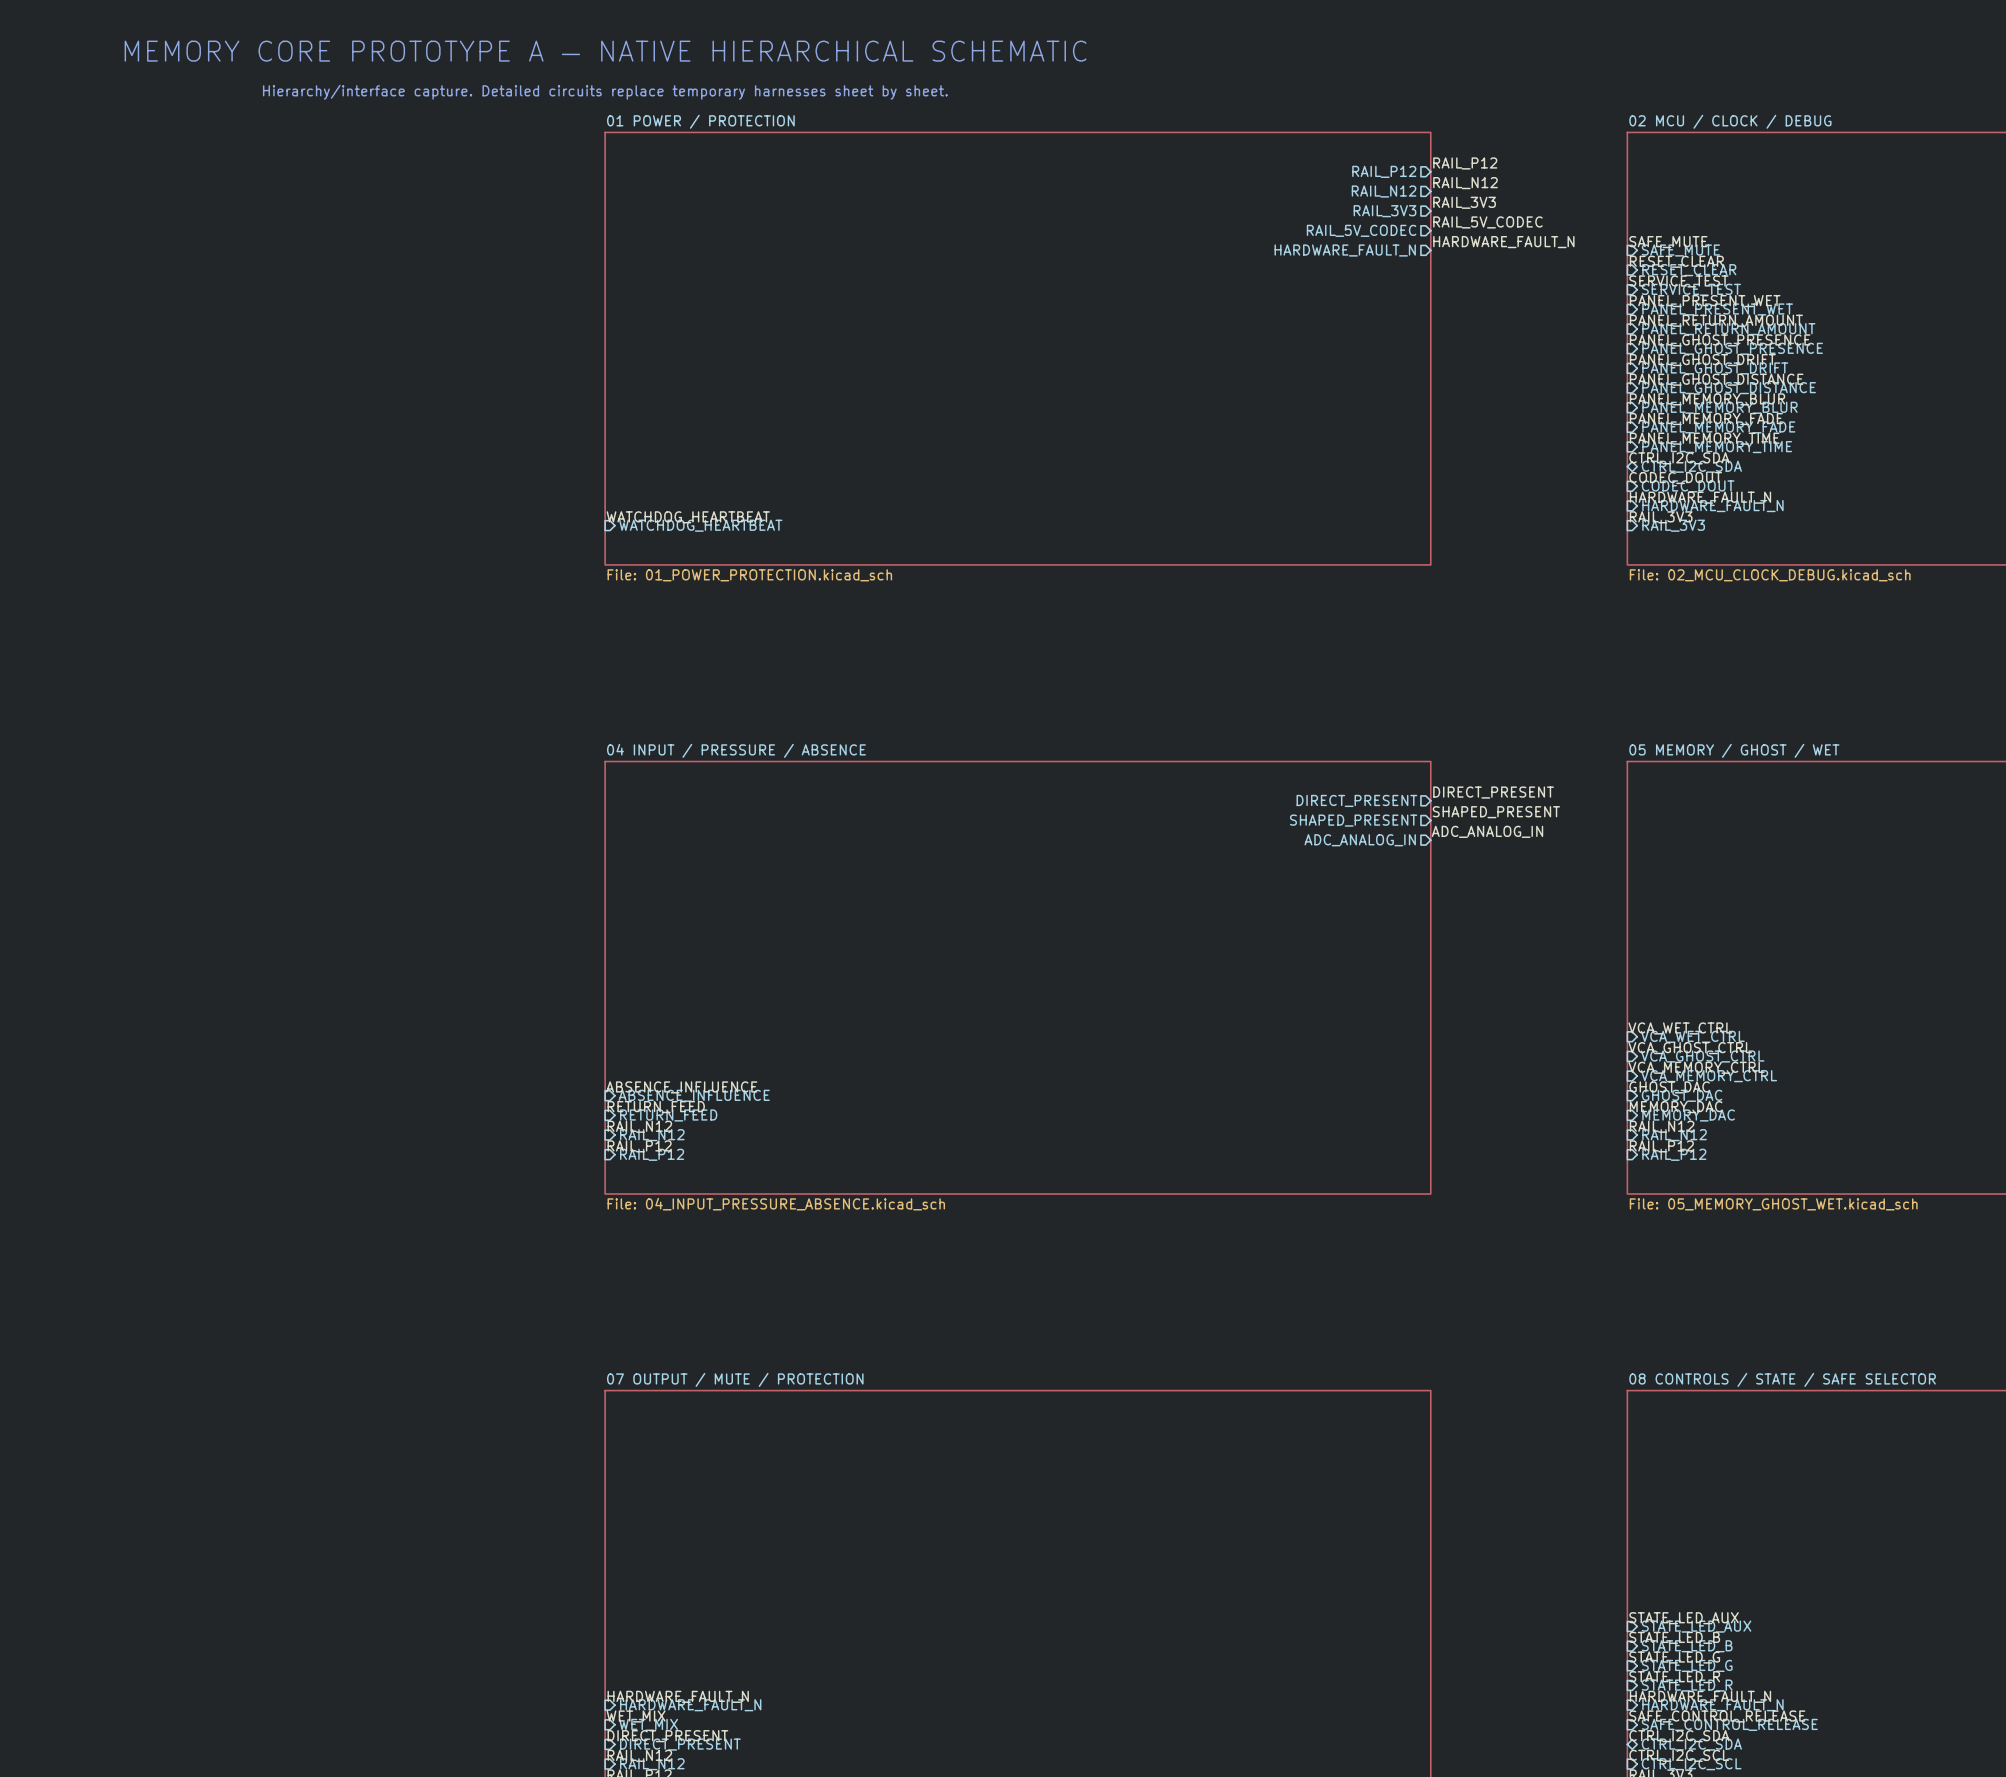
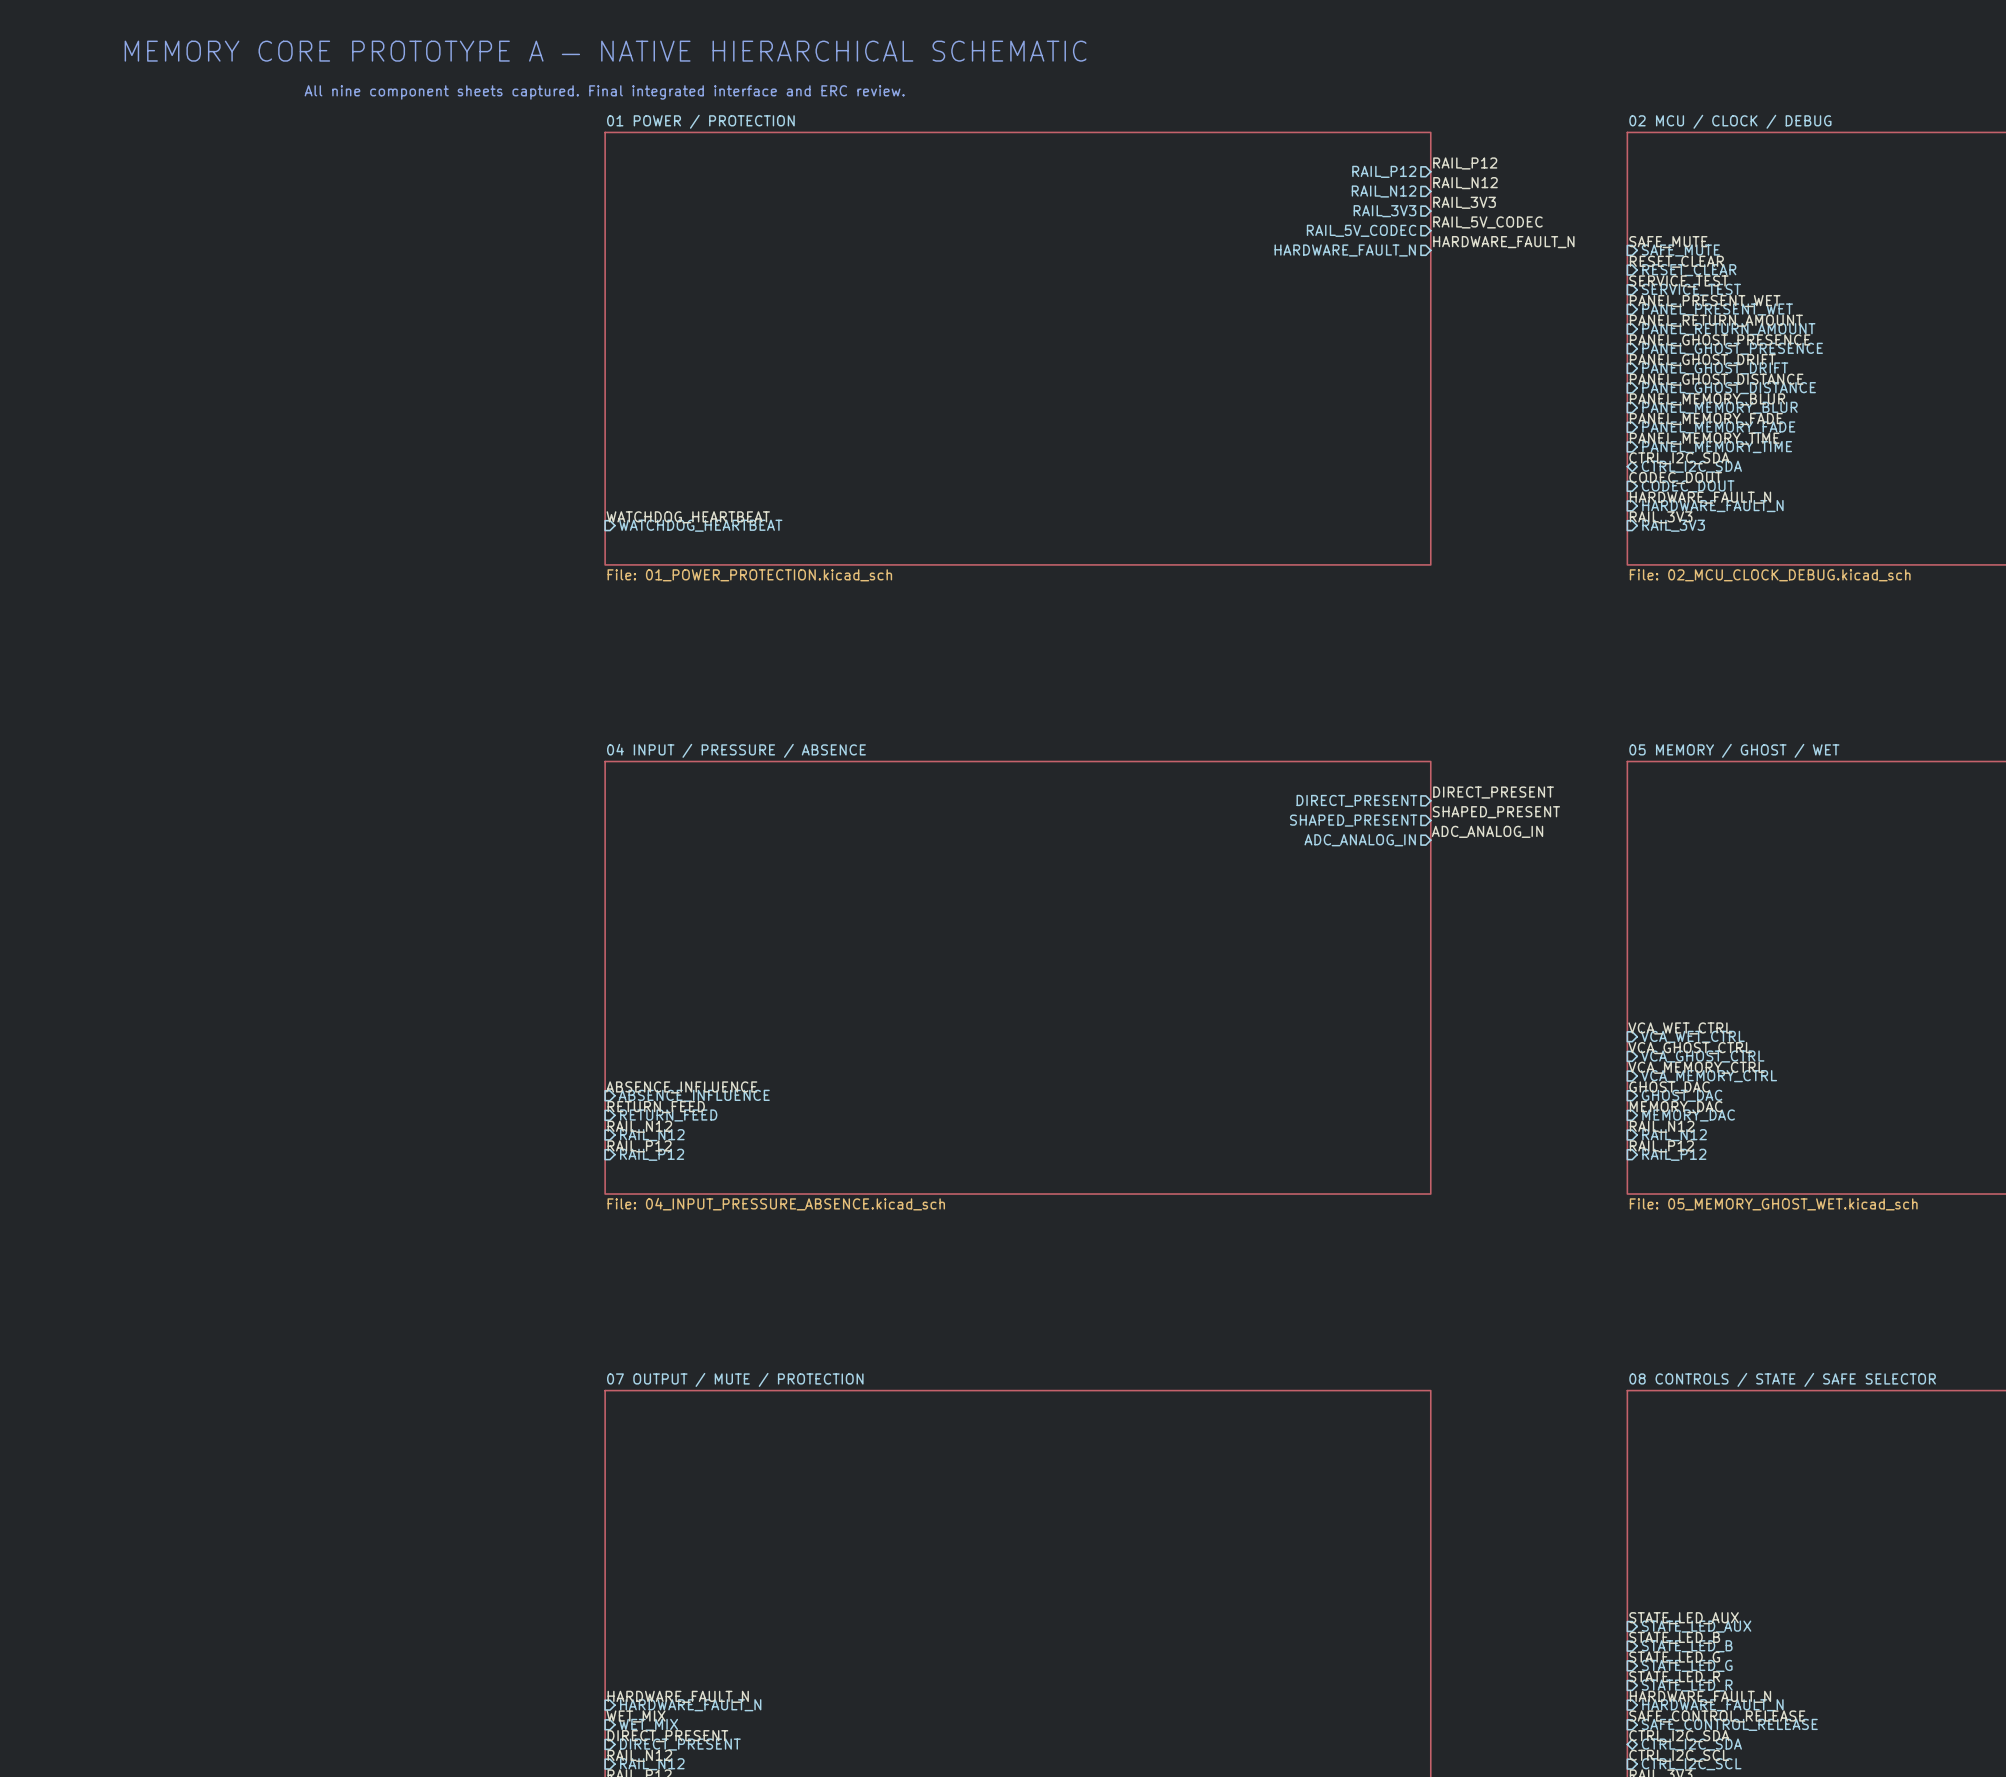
text: Hierarchy/interface capture. Detailed circuits replace temporary harnesses sheet by sheet. (605, 92) -> All nine component sheets captured. Final integrated interface and ERC review. (604, 92)

